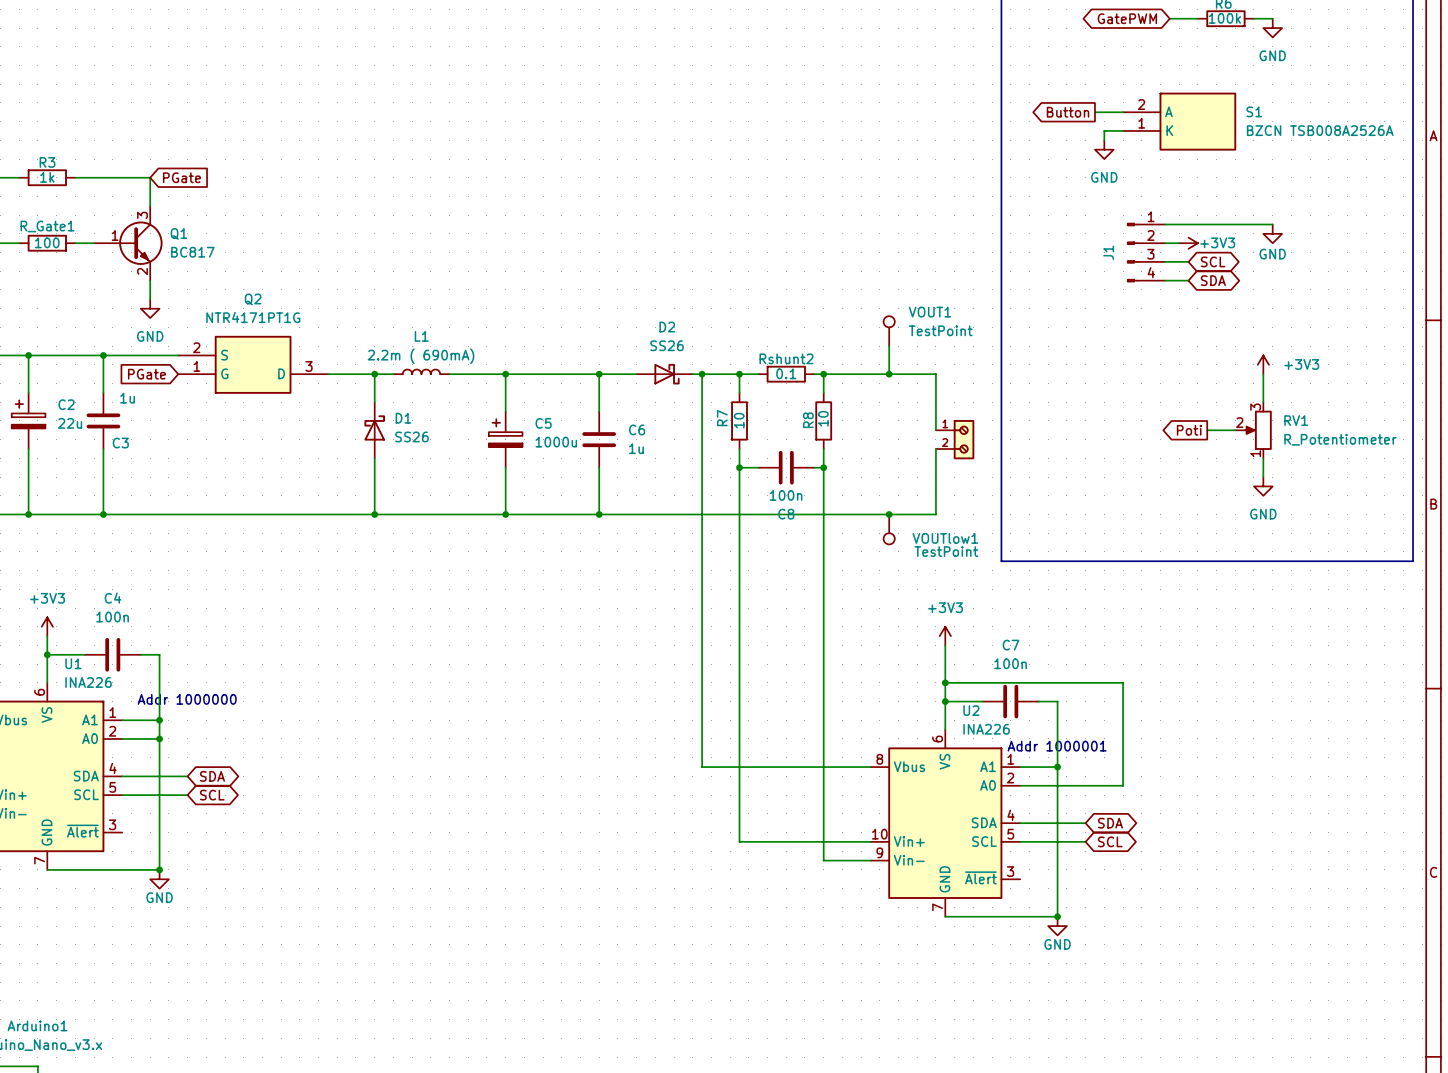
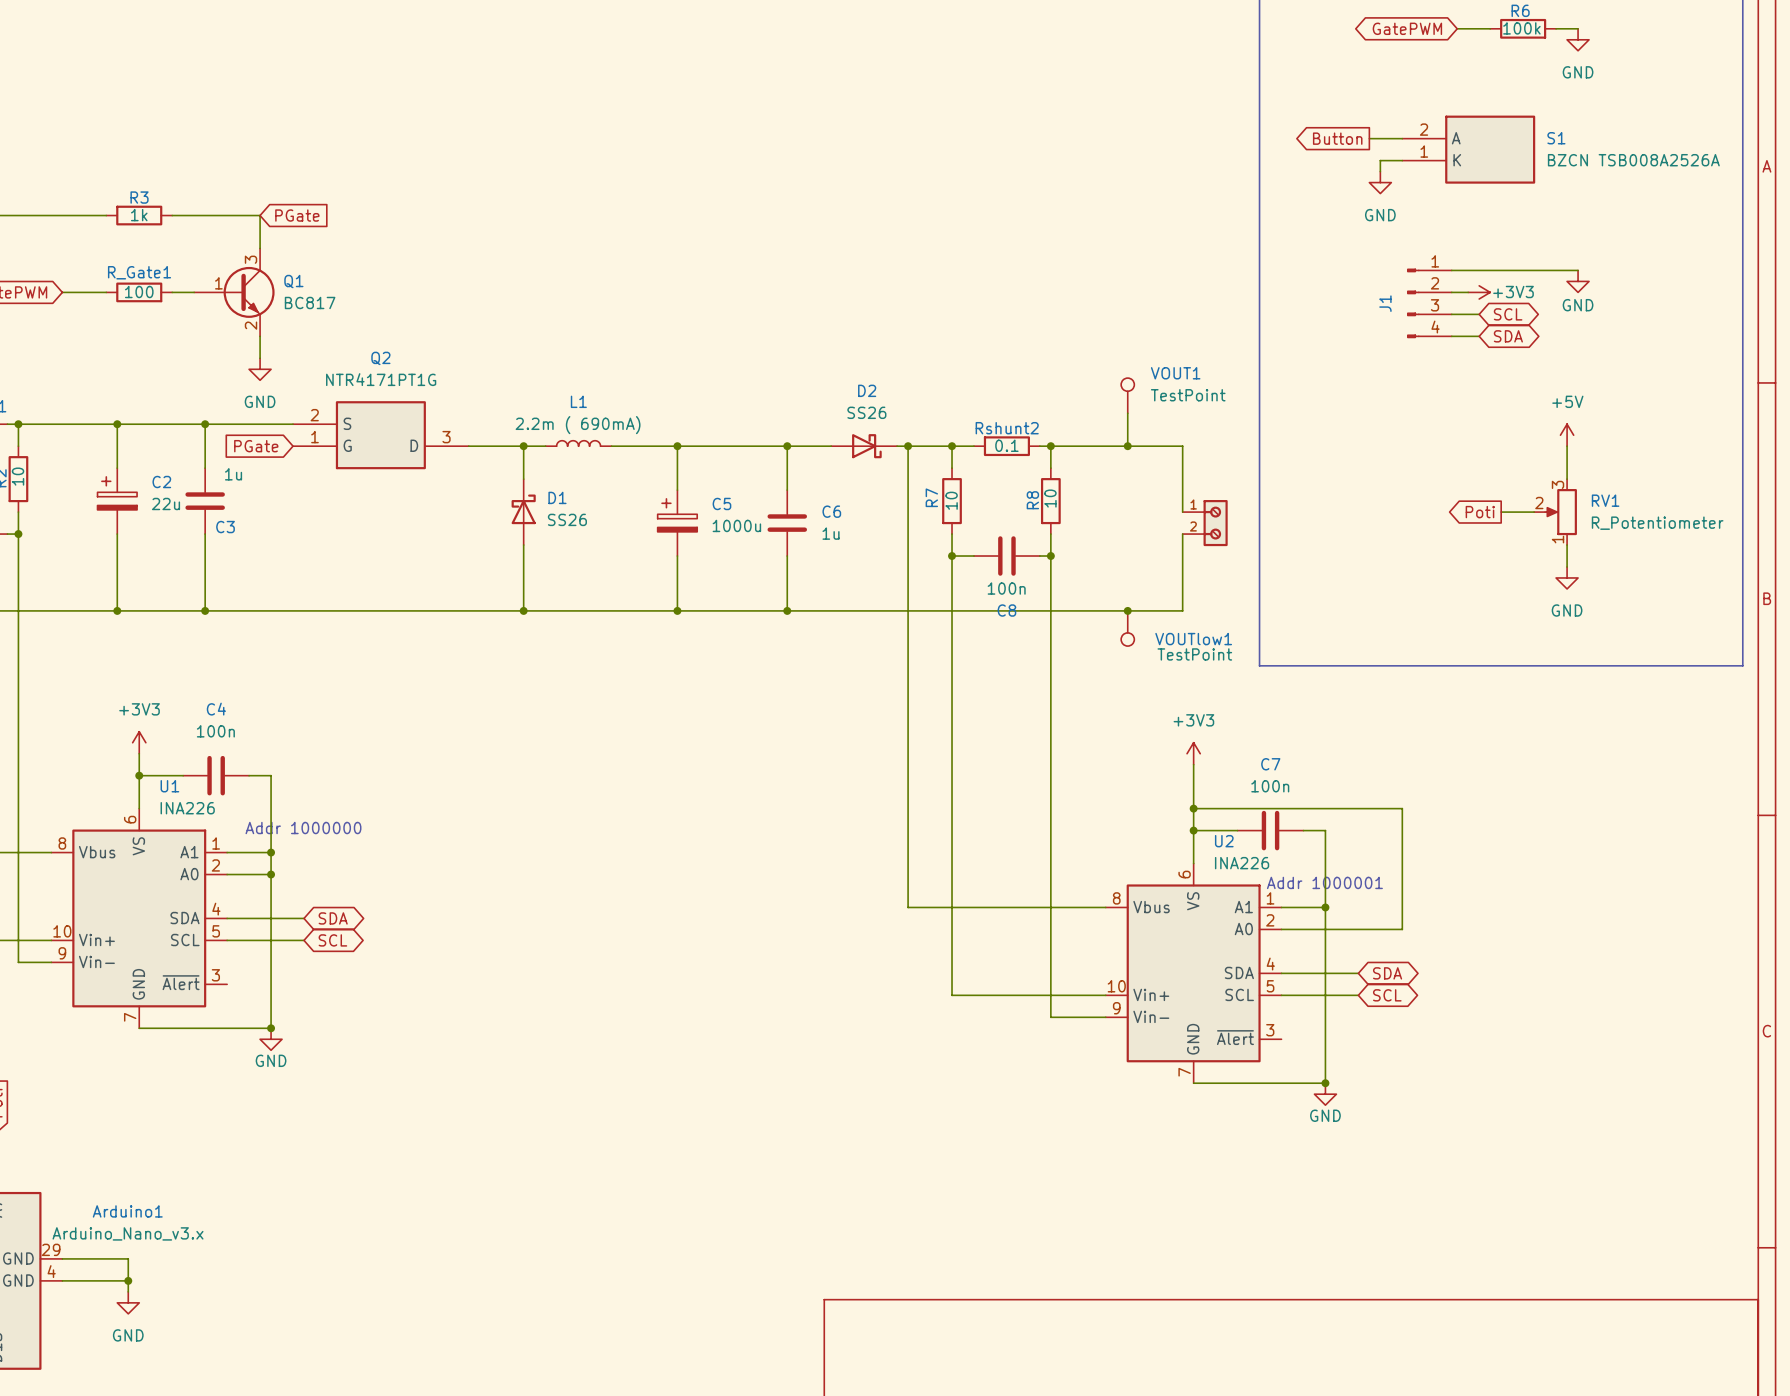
power symbol: +3V3 (1263, 364) -> +5V (1567, 435)

